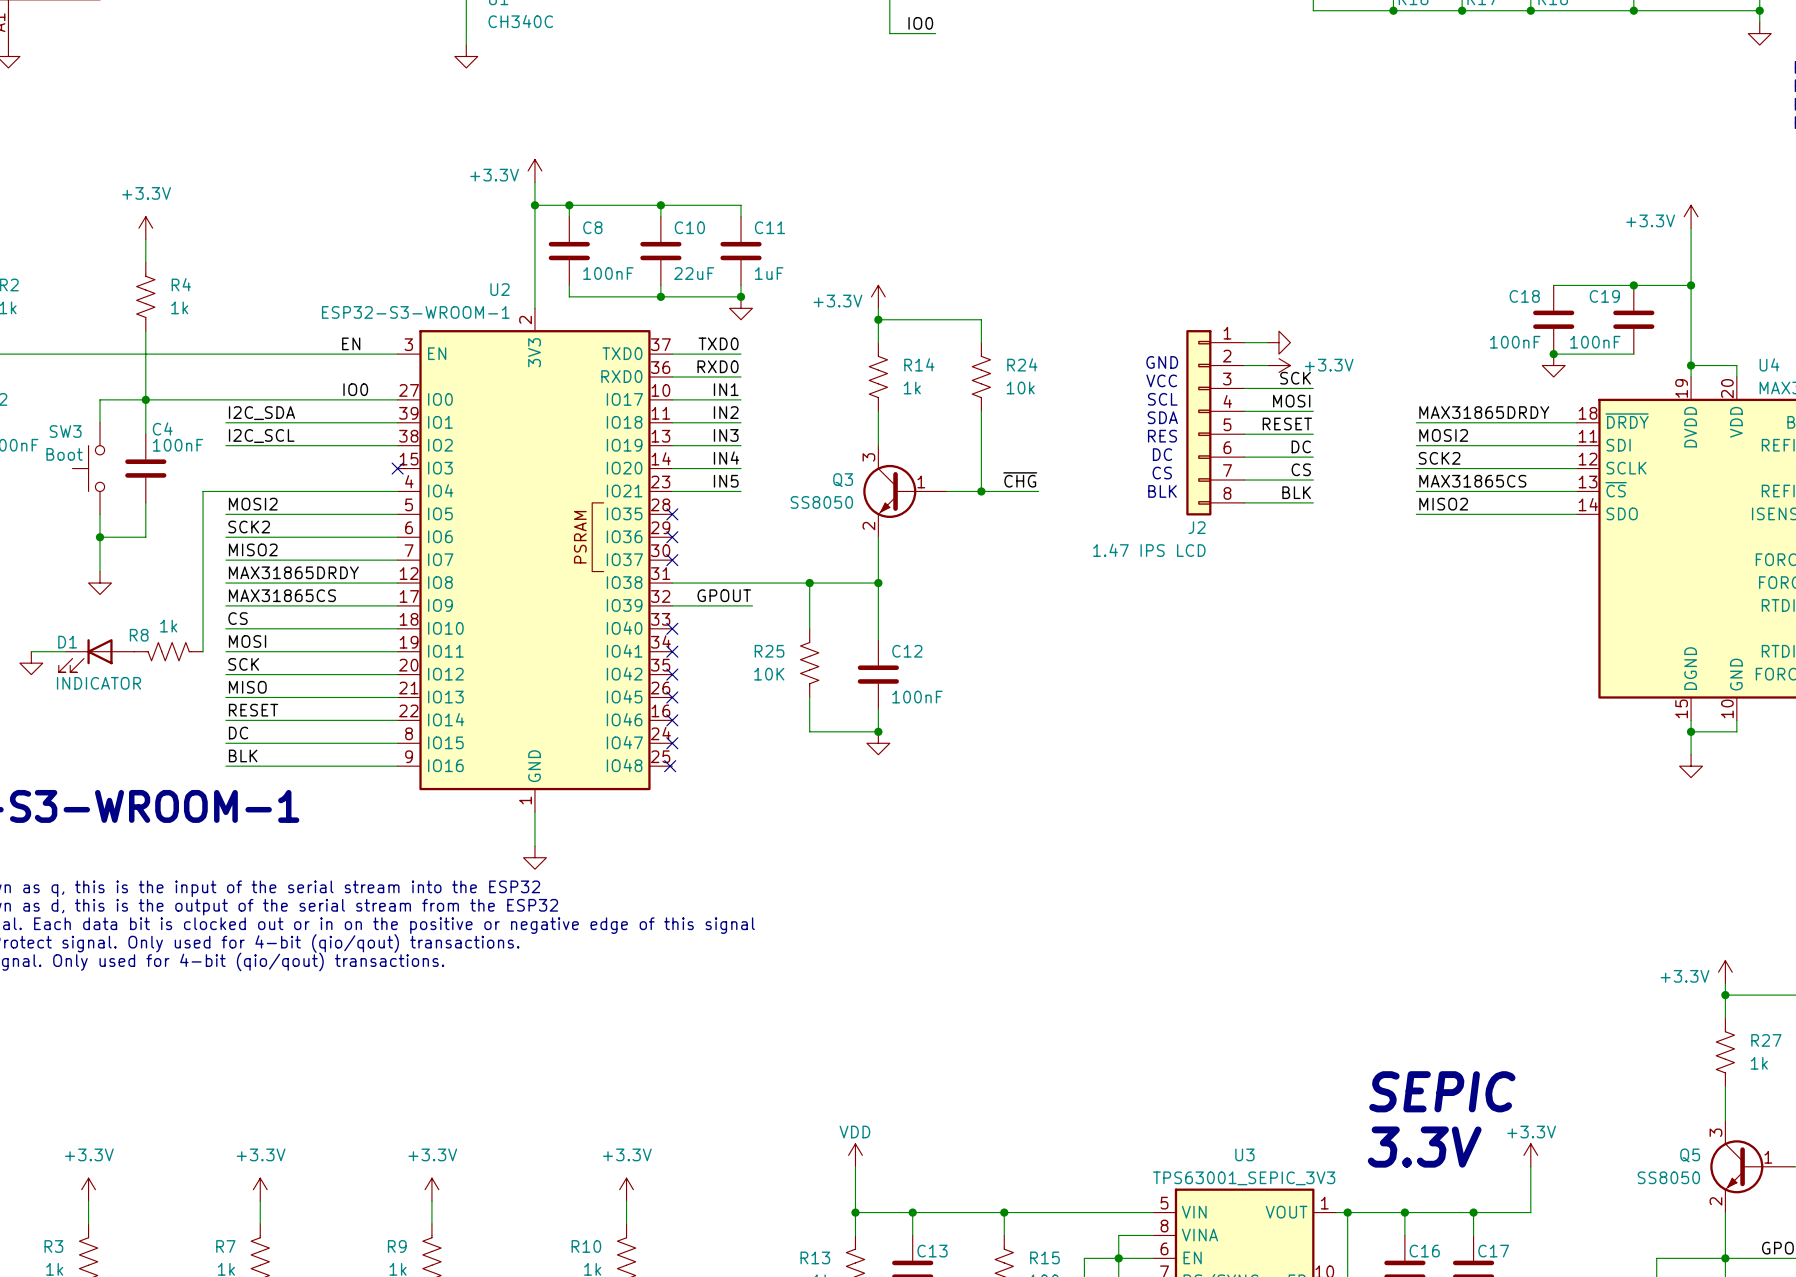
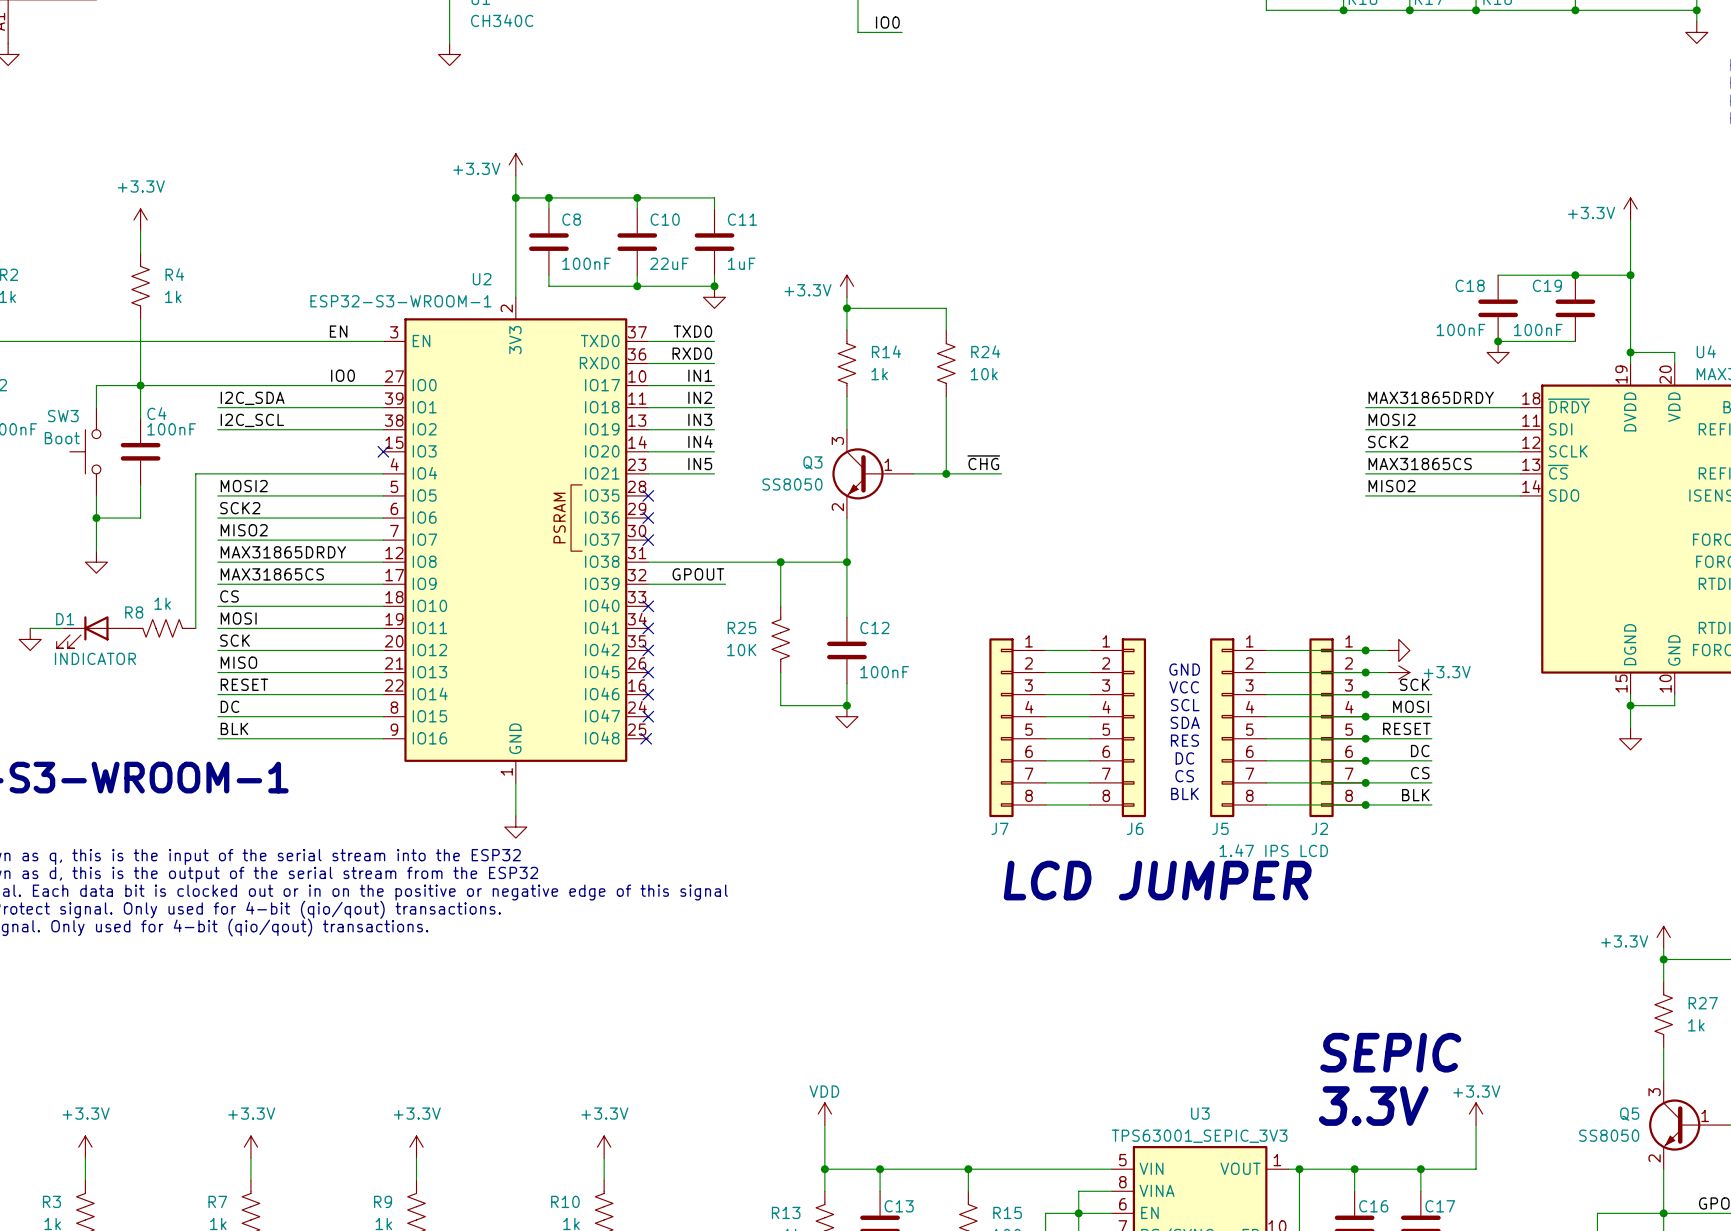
wire: (1244, 342) (1267, 342) -> none
power symbol: (1278, 342) -> none
text: GND (1162, 362) -> none
wire: (1244, 365) (1267, 365) -> none
power symbol: +3.3V (1278, 365) -> none
label: SCK (1295, 378) -> none
text: VCC (1161, 380) -> none
wire: (1244, 388) (1313, 388) -> none
text: SCL (1162, 399) -> none
label: MOSI (1291, 401) -> none
wire: (1244, 411) (1313, 411) -> none
text: SDA (1162, 417) -> none
J2 position: (1215, 422) -> (1337, 727)
label: RESET (1287, 424) -> none
wire: (1244, 434) (1313, 434) -> none
text: RES (1162, 436) -> none
label: DC (1301, 446) -> none
text: DC (1162, 454) -> none
wire: (1244, 457) (1313, 457) -> none
label: CS (1301, 469) -> none
text: CS (1162, 473) -> none
wire: (1244, 480) (1313, 480) -> none
text: BLK (1162, 491) -> none
label: BLK (1296, 492) -> none
wire: (1244, 502) (1313, 502) -> none
wire: none -> (1045, 650) (1089, 650)
wire: none -> (1266, 650) (1387, 650)
junction: none -> (1365, 650)
power symbol: none -> (1398, 650)
text: none -> GND (1184, 669)
wire: none -> (1045, 672) (1089, 672)
wire: none -> (1266, 672) (1387, 672)
junction: none -> (1365, 672)
power symbol: none -> +3.3V (1398, 672)
label: none -> SCK (1414, 684)
text: none -> VCC (1184, 687)
wire: none -> (1045, 694) (1089, 694)
wire: none -> (1266, 694) (1431, 694)
junction: none -> (1365, 694)
text: none -> SCL (1185, 705)
label: none -> MOSI (1411, 706)
wire: none -> (1045, 716) (1089, 716)
wire: none -> (1266, 716) (1431, 716)
junction: none -> (1365, 716)
text: none -> SDA (1185, 722)
J7: none -> (1017, 727)
J6: none -> (1117, 727)
J5: none -> (1238, 727)
label: none -> RESET (1406, 728)
wire: none -> (1045, 738) (1089, 738)
wire: none -> (1266, 738) (1431, 738)
junction: none -> (1365, 738)
text: none -> RES (1184, 740)
label: none -> DC (1420, 750)
text: none -> DC (1184, 758)
wire: none -> (1045, 760) (1089, 760)
wire: none -> (1266, 760) (1431, 760)
junction: none -> (1365, 760)
label: none -> CS (1420, 773)
text: none -> CS (1184, 776)
wire: none -> (1045, 782) (1089, 782)
wire: none -> (1266, 782) (1431, 782)
junction: none -> (1365, 782)
text: none -> BLK (1184, 793)
label: none -> BLK (1415, 795)
wire: none -> (1045, 804) (1089, 804)
wire: none -> (1266, 804) (1431, 804)
junction: none -> (1365, 804)
text: none -> LCD JUMPER (1157, 880)

